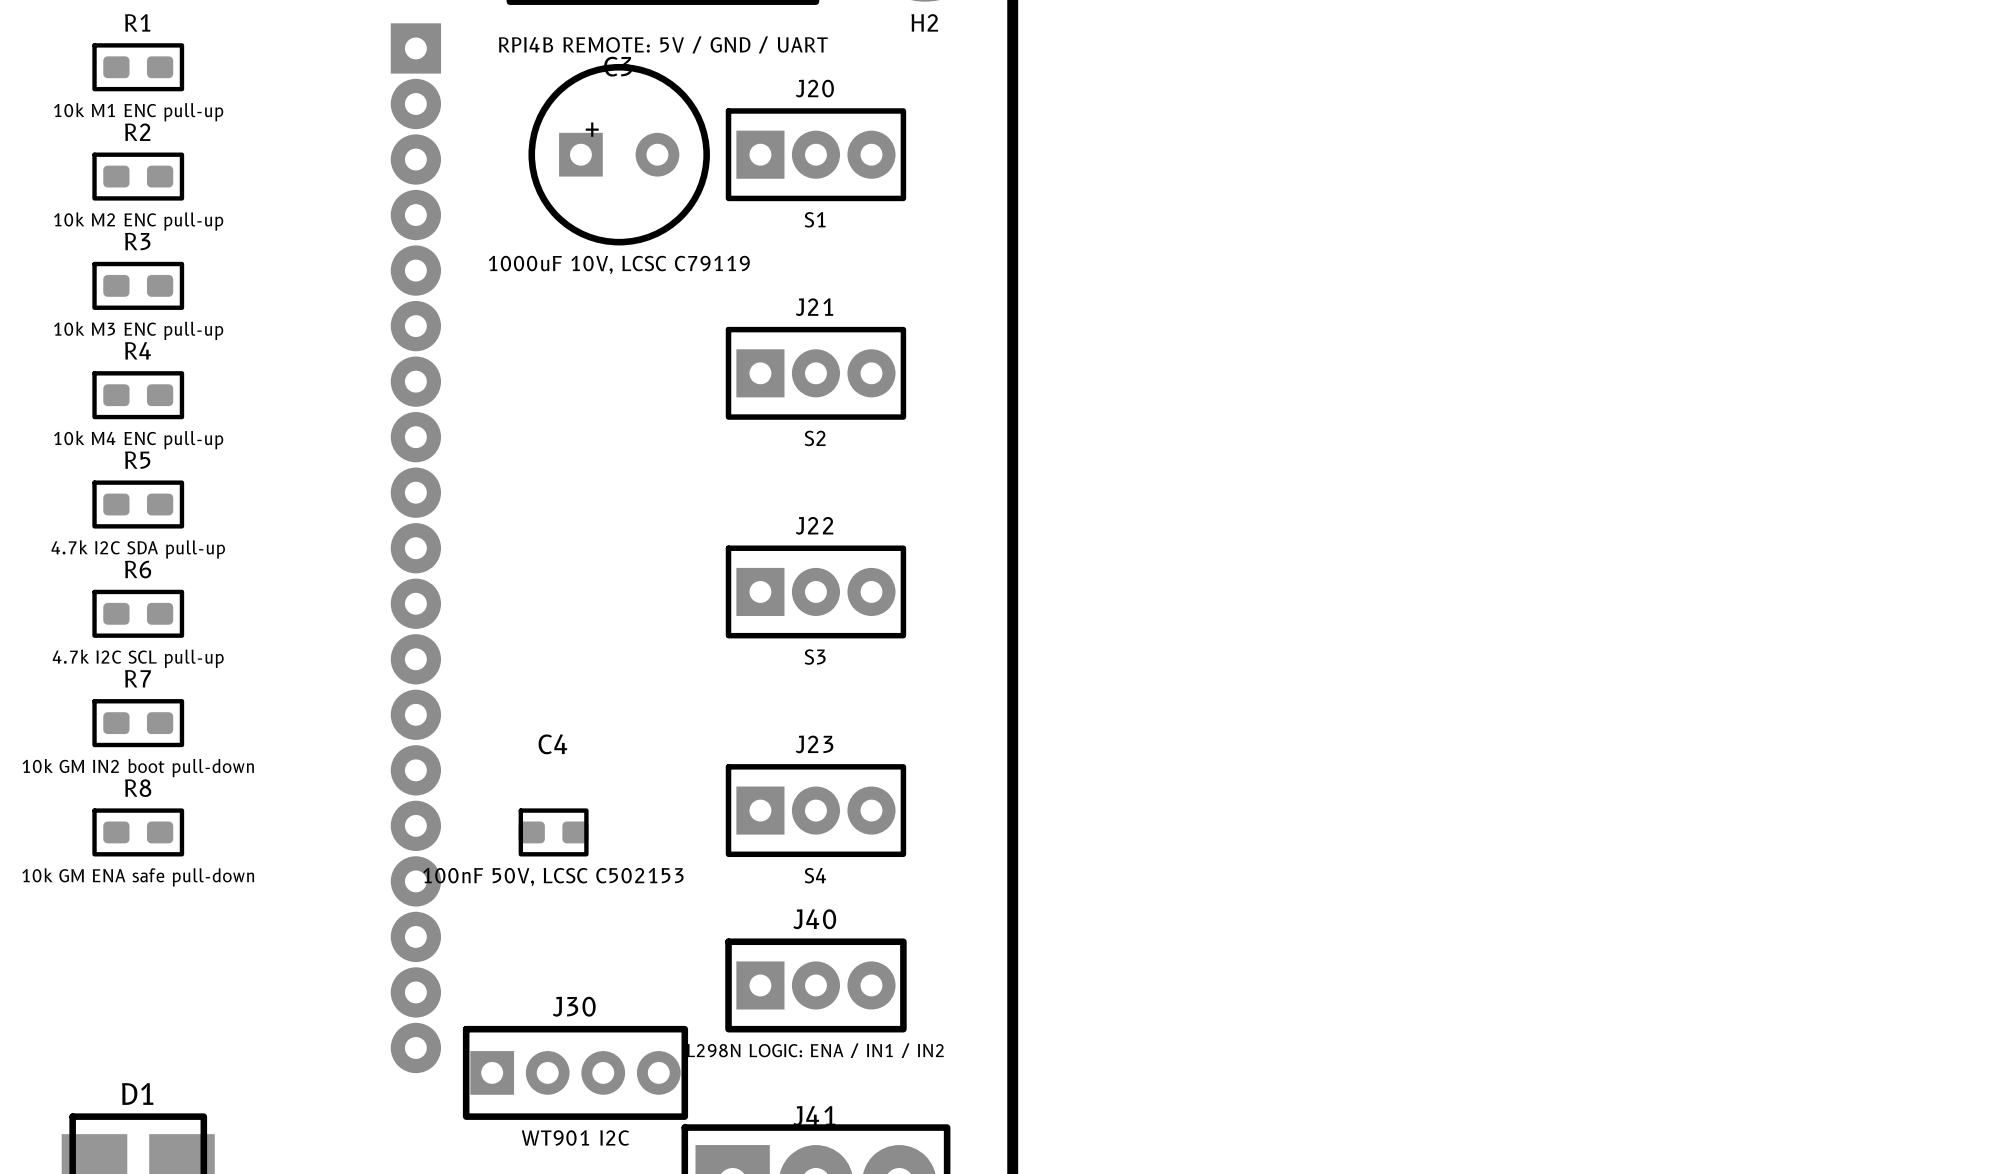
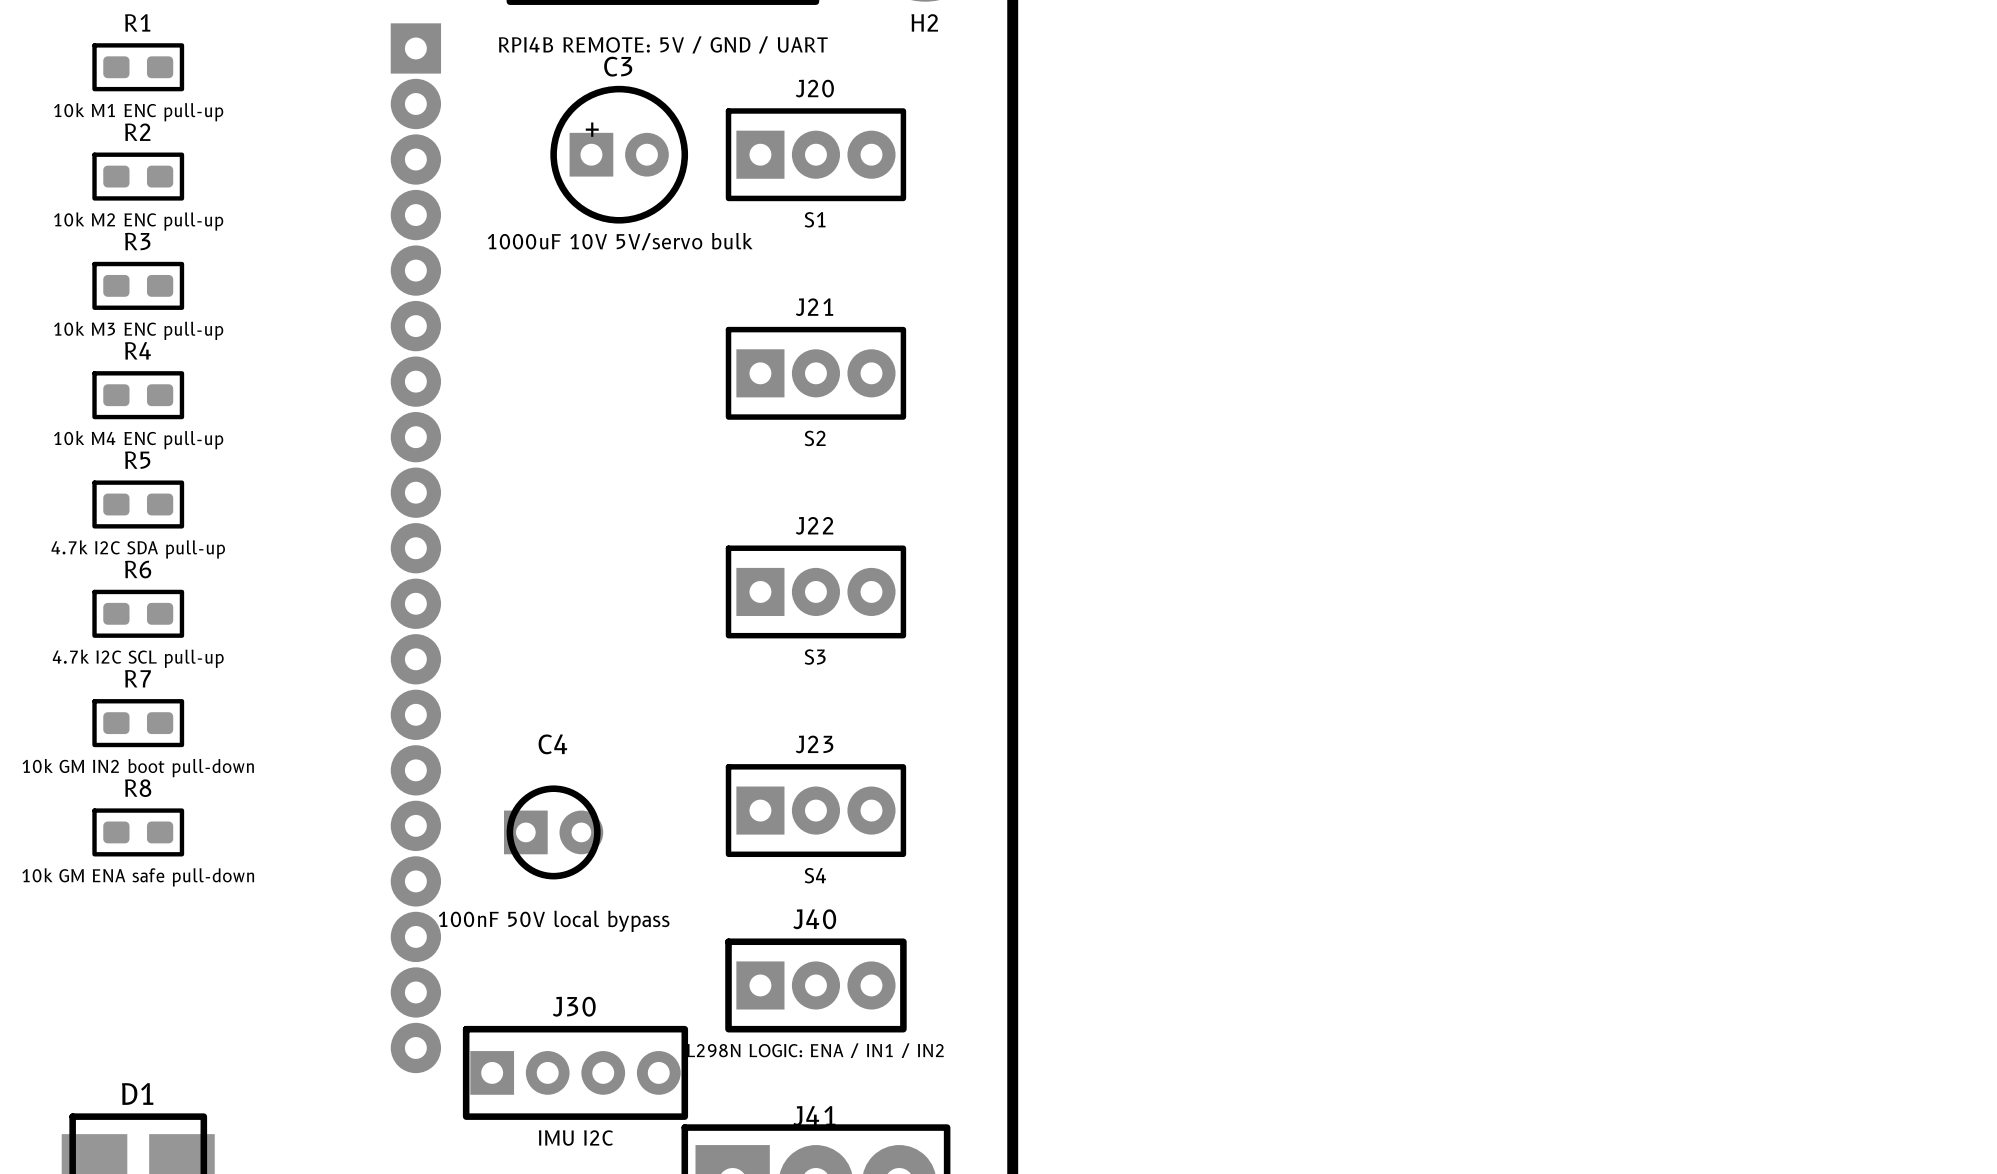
C3 footprint: [528, 63, 710, 246] -> [550, 85, 689, 224]
C3 value: 1000uF 10V, LCSC C79119 (619, 264) -> 1000uF 10V 5V/servo bulk (620, 241)
C4 footprint: [518, 808, 589, 857] -> [503, 785, 604, 880]
C4 value: 100nF 50V, LCSC C502153 (553, 877) -> 100nF 50V local bypass (554, 921)
J30 value: WT901 I2C (575, 1138) -> IMU I2C (575, 1138)

